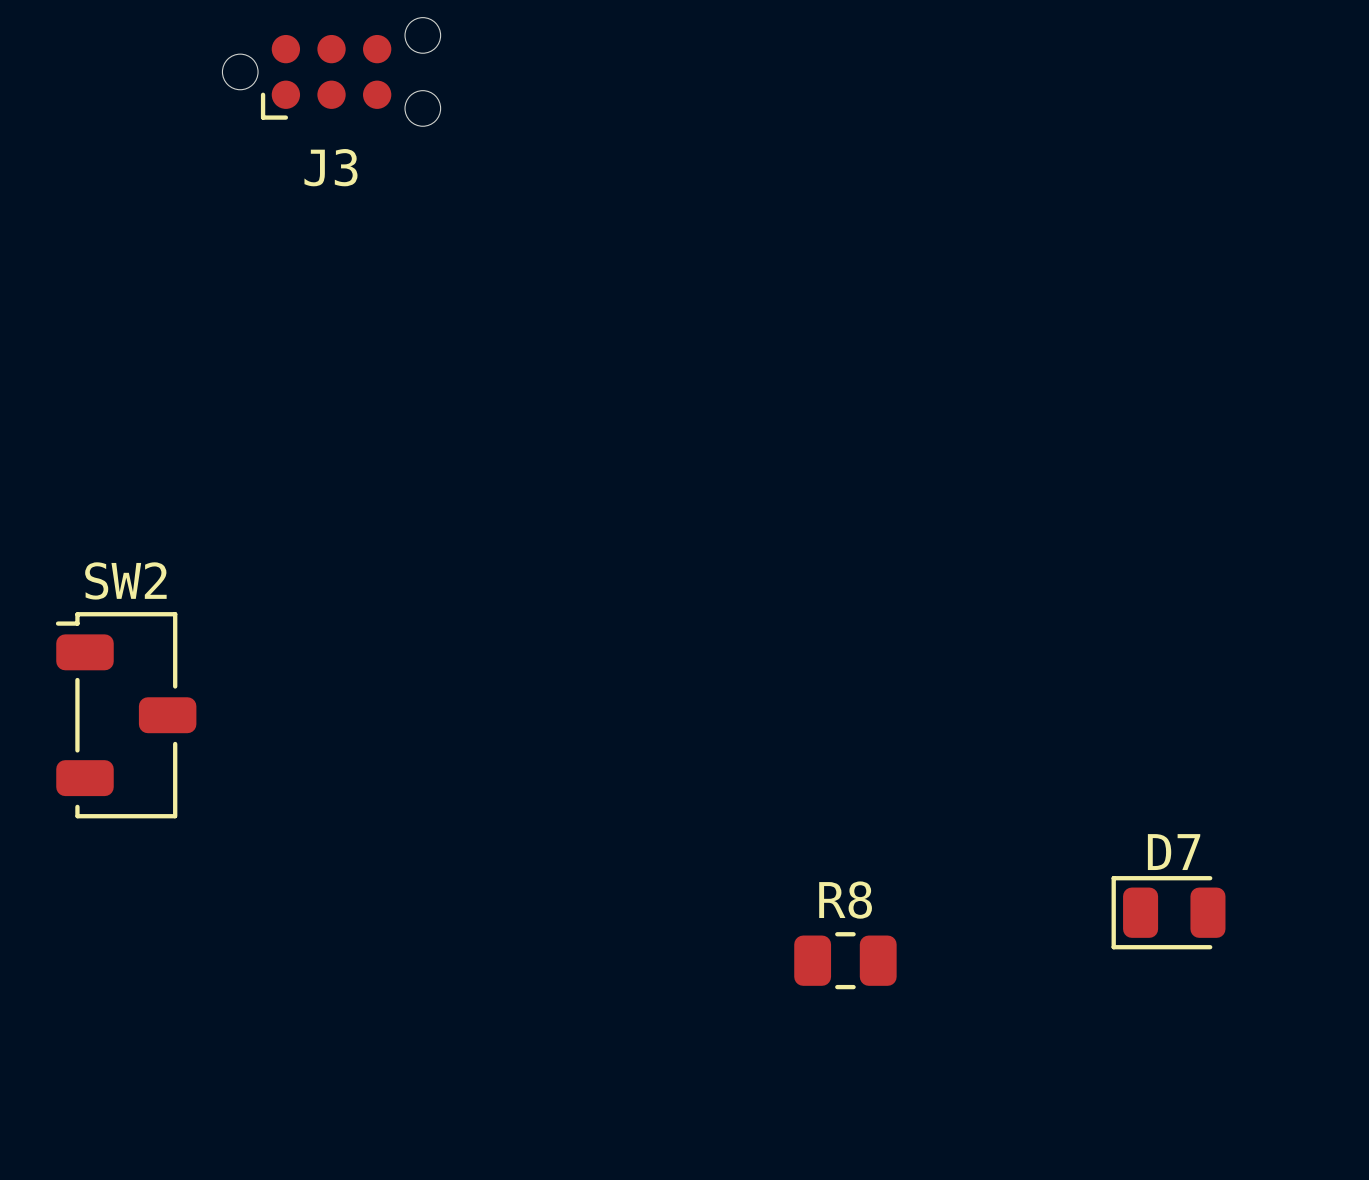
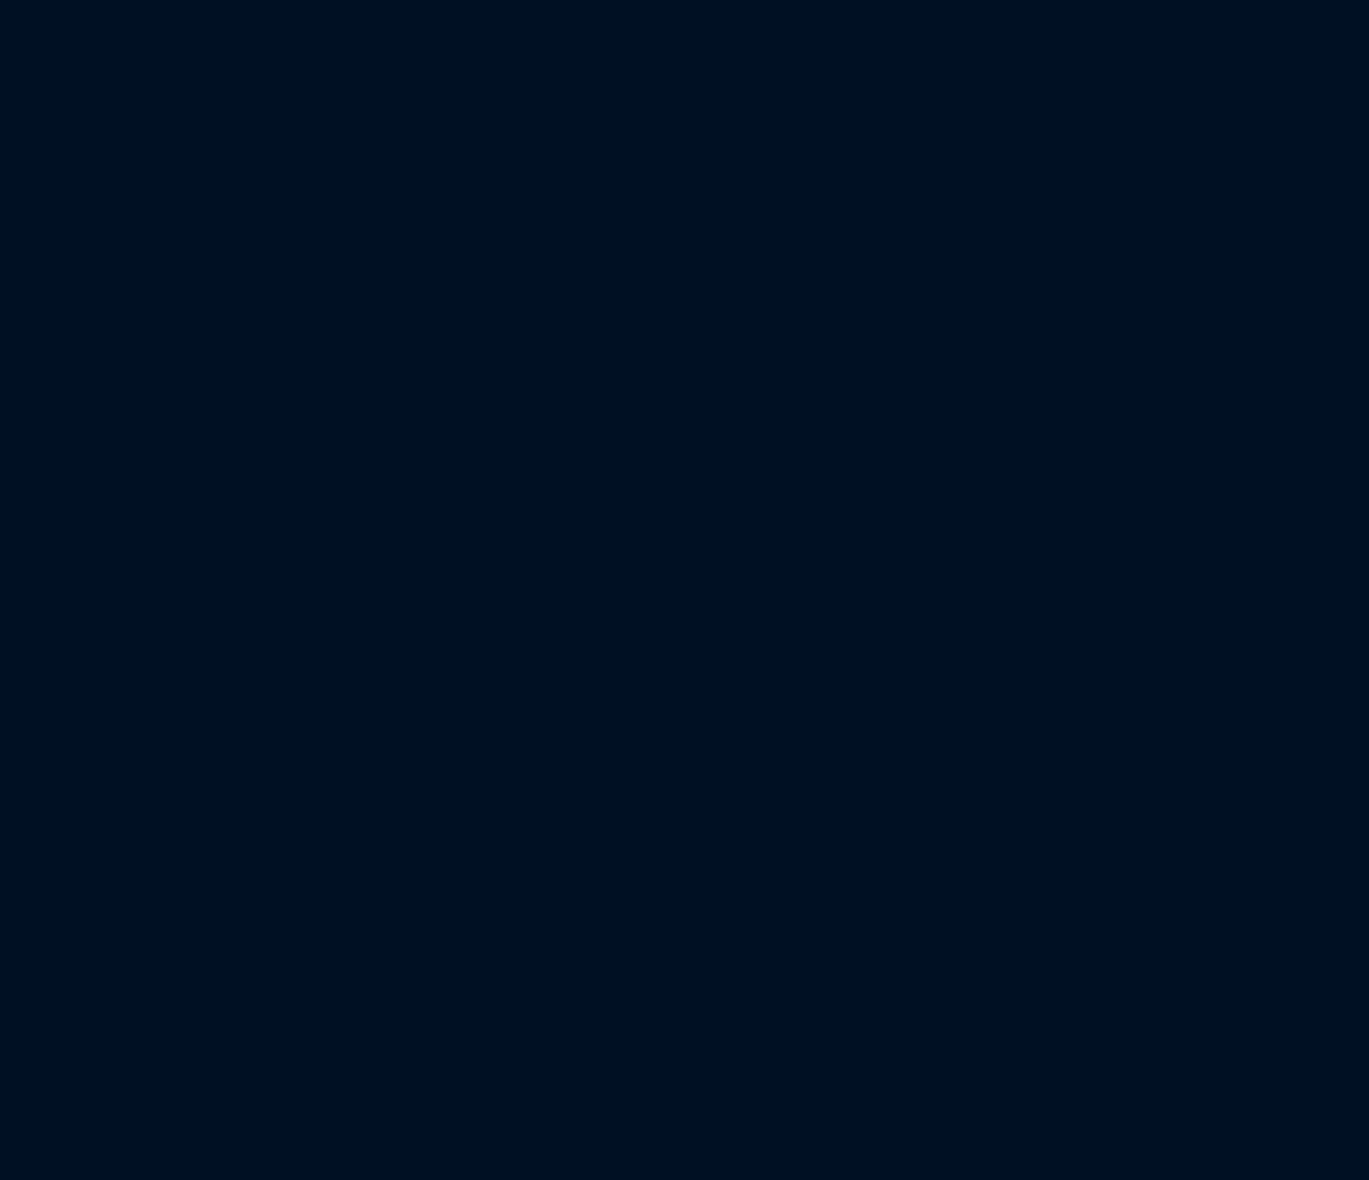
J3: (331, 71) -> none
SW2: (126, 715) -> none
D7: (1168, 912) -> none
R8: (845, 960) -> none

